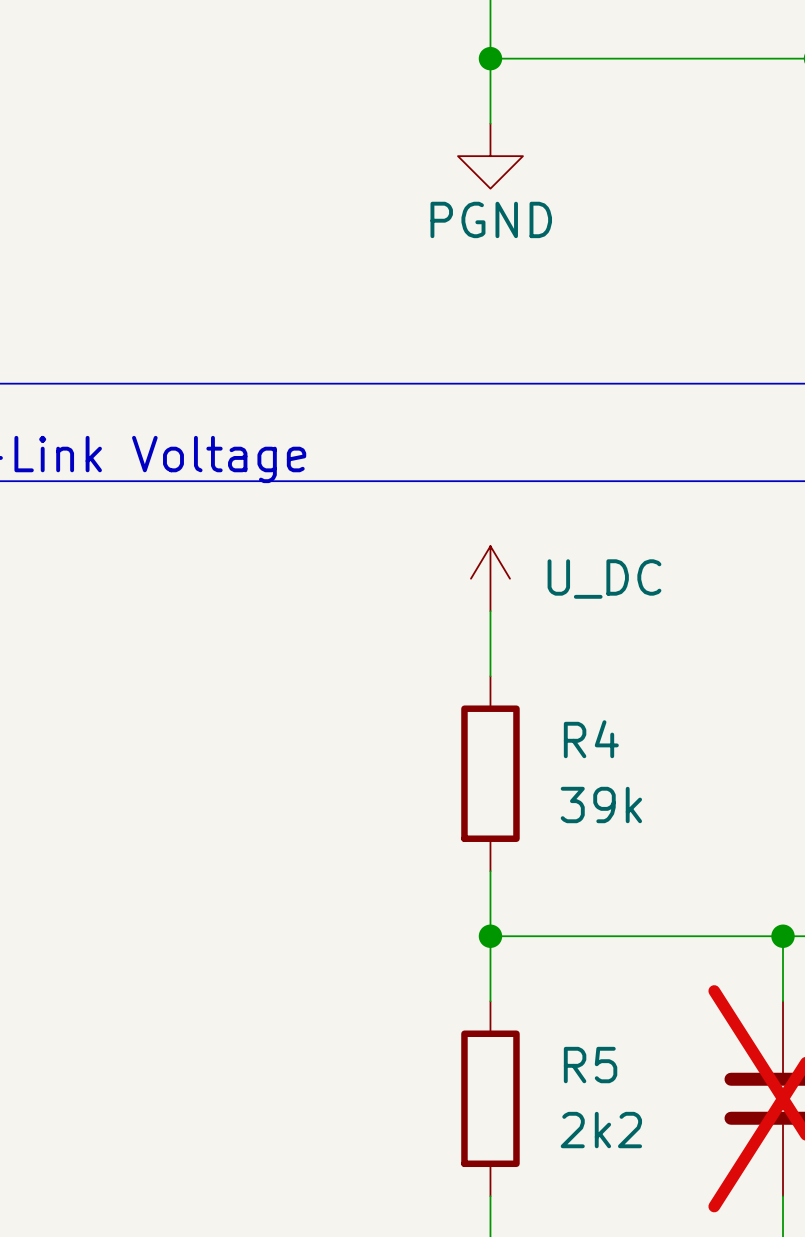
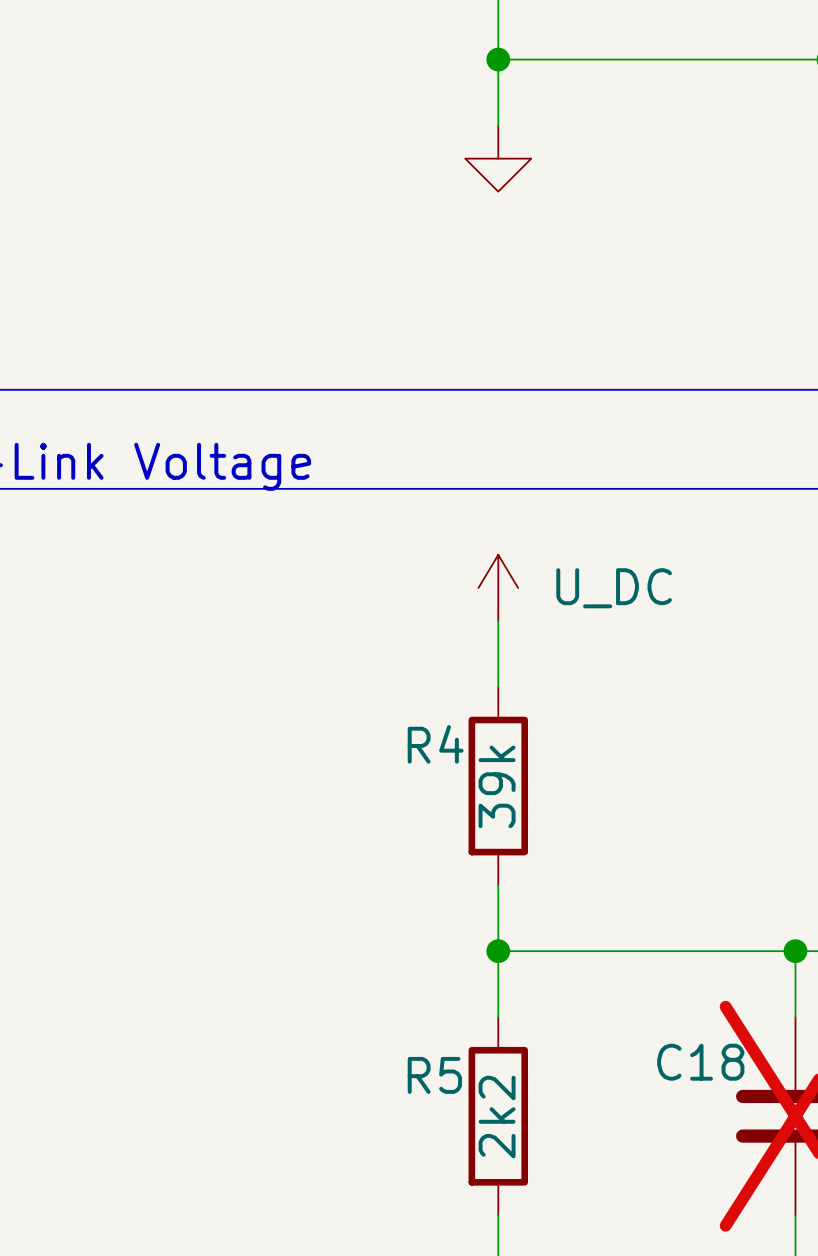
power symbol text: PGND (491, 219) -> none
R4 name position: R4 (591, 739) -> R4 (435, 744)
R4 text: none -> 39k (497, 786)
R4 value: 39k (601, 805) -> none
C18 name: none -> C18 (700, 1062)
R5 name position: R5 (590, 1065) -> R5 (434, 1075)
R5 text: none -> 2k2 (497, 1117)
R5 value: 2k2 (601, 1130) -> none

